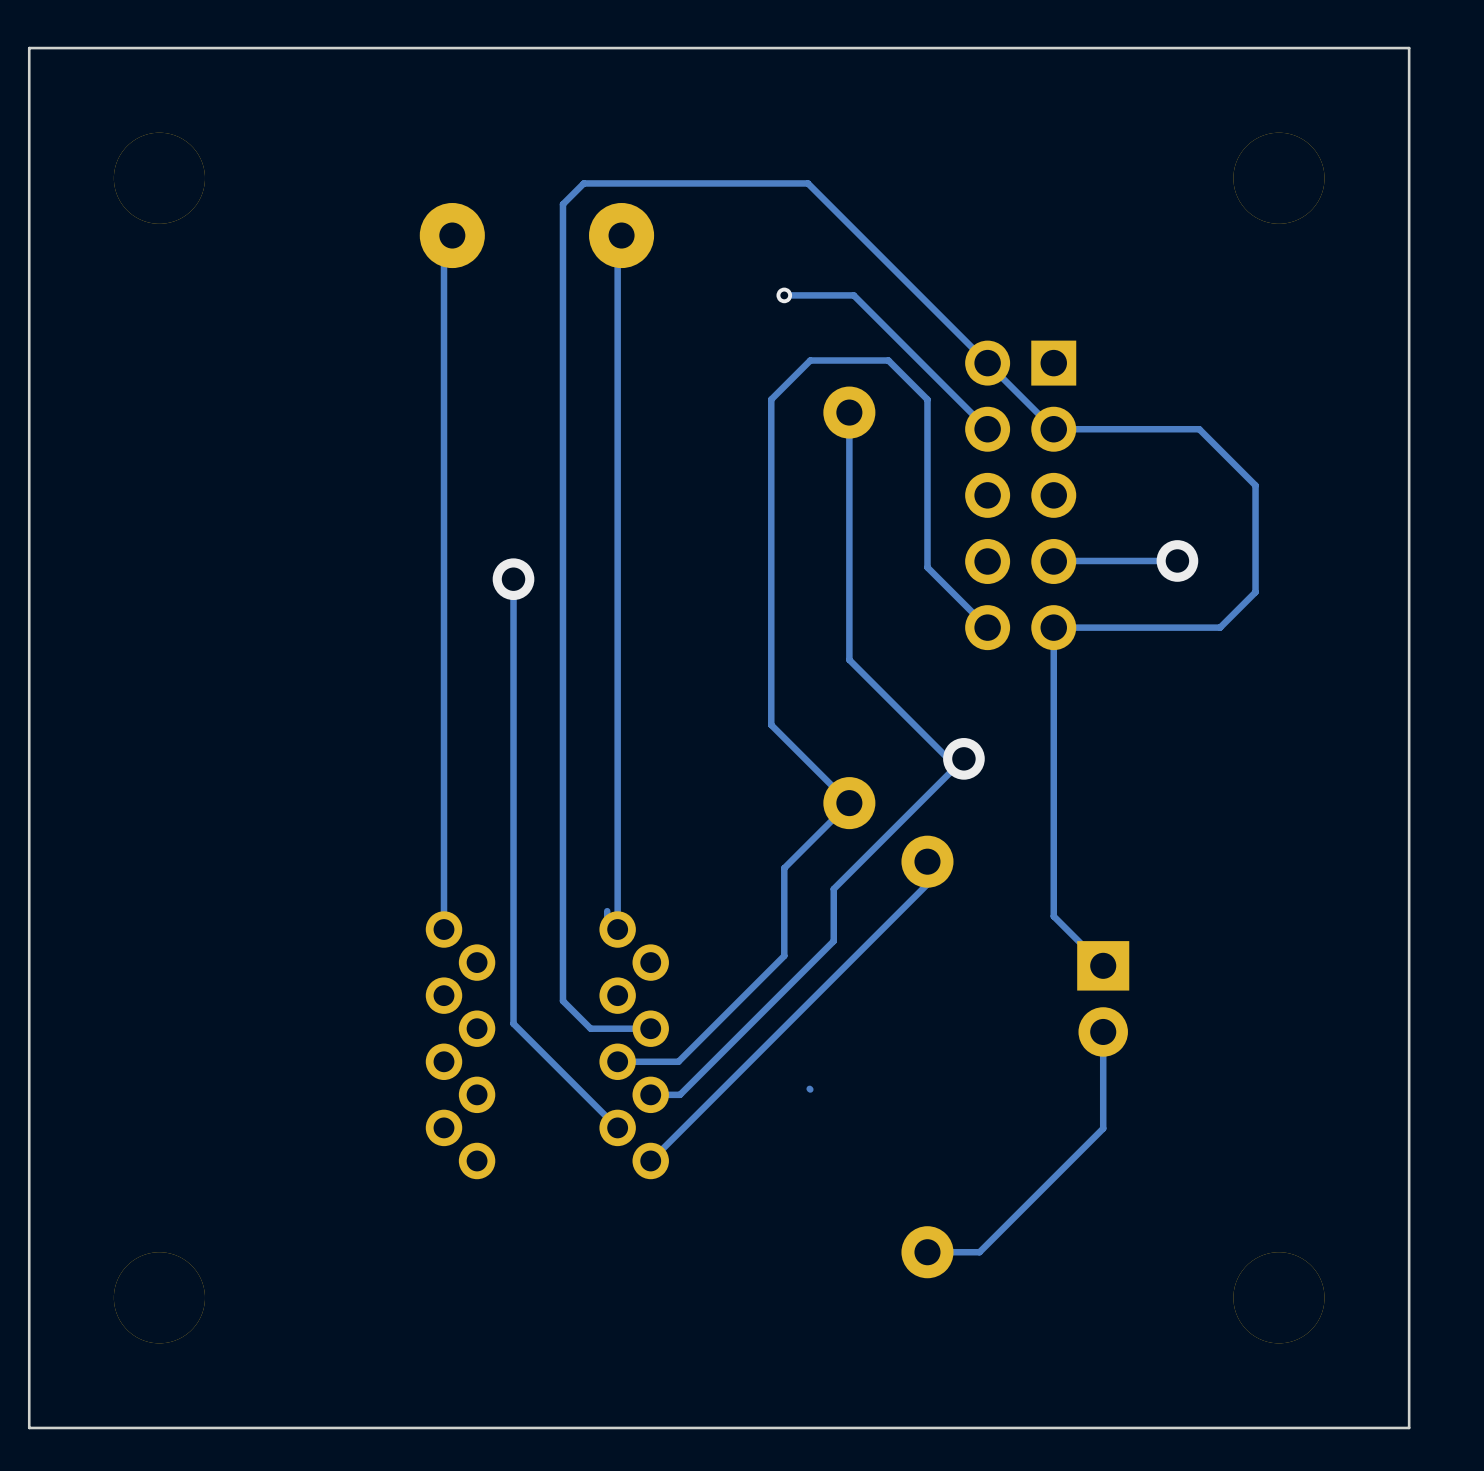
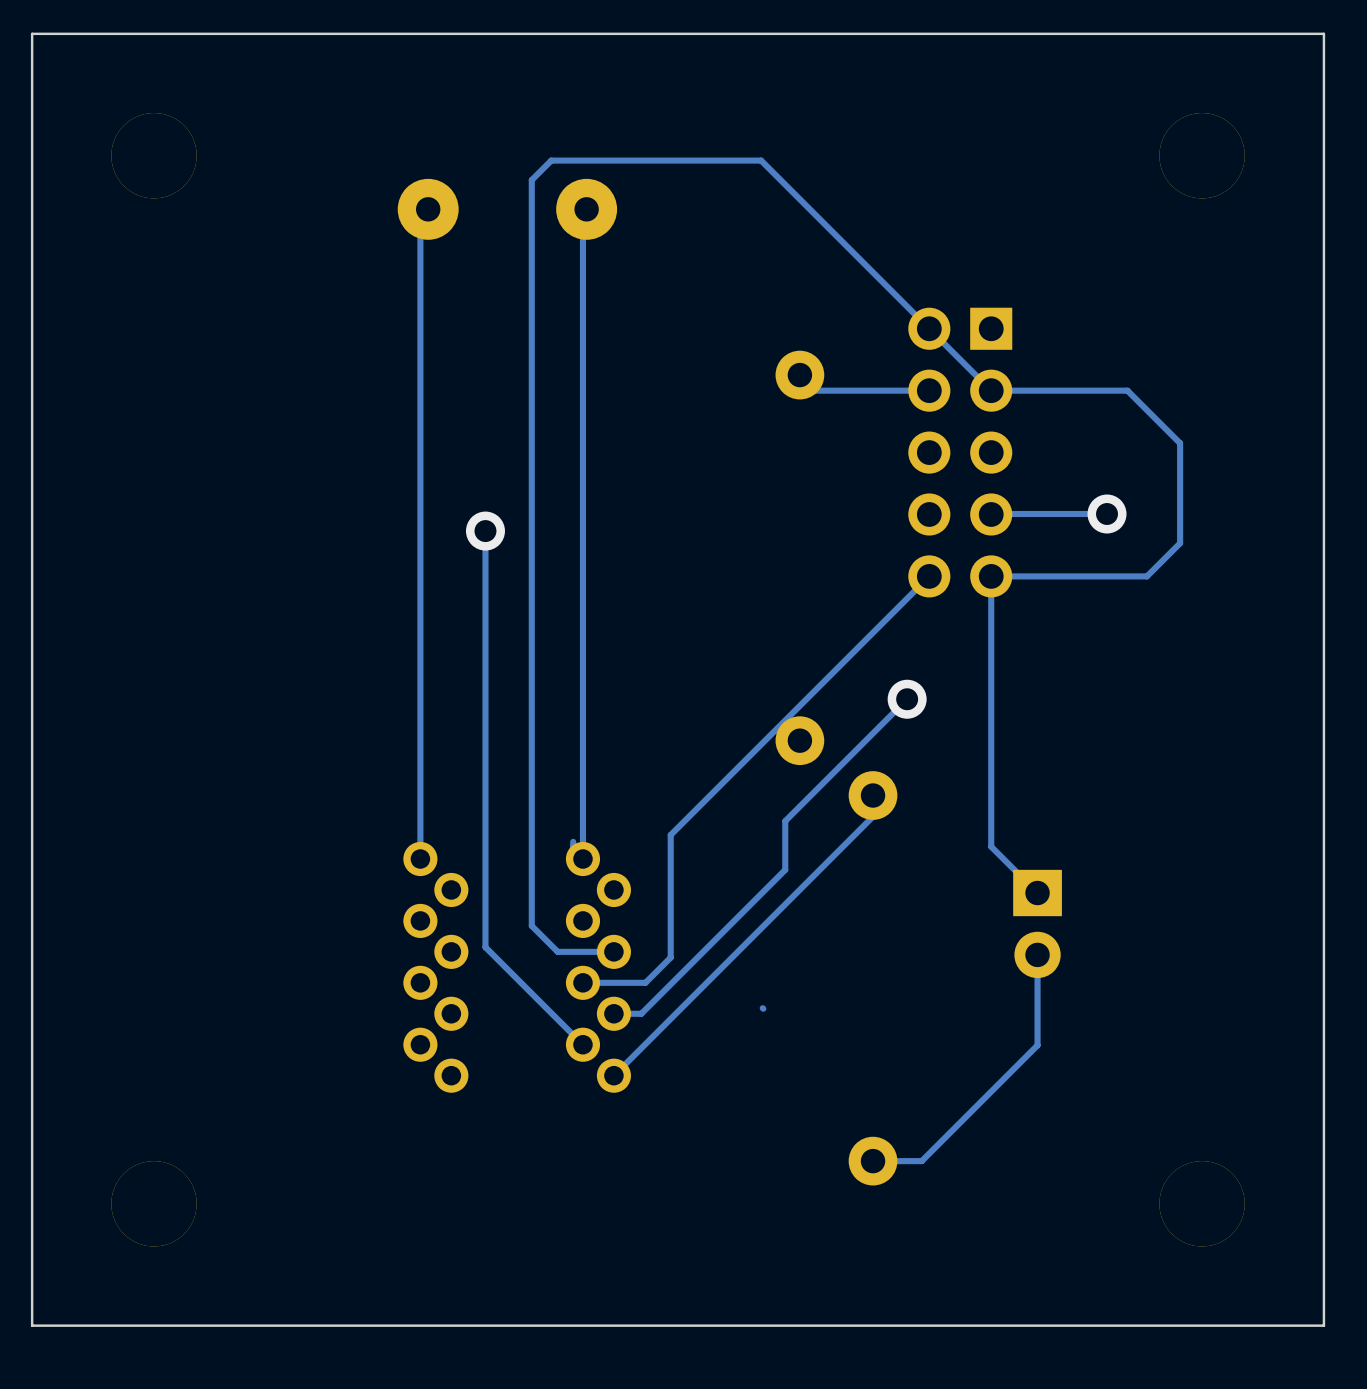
track: (784, 295) (853, 295) (987, 429) -> (808, 390) (929, 390)
via: (784, 295) -> none
track: (849, 412) (849, 659) (948, 758) (963, 758) -> none
track: (987, 627) (927, 567) (927, 399) (888, 360) (810, 360) (771, 399) (771, 725) (849, 803) (784, 868) (784, 955) (678, 1061) -> (929, 576) (670, 835) (670, 957) (645, 982) (639, 982)

